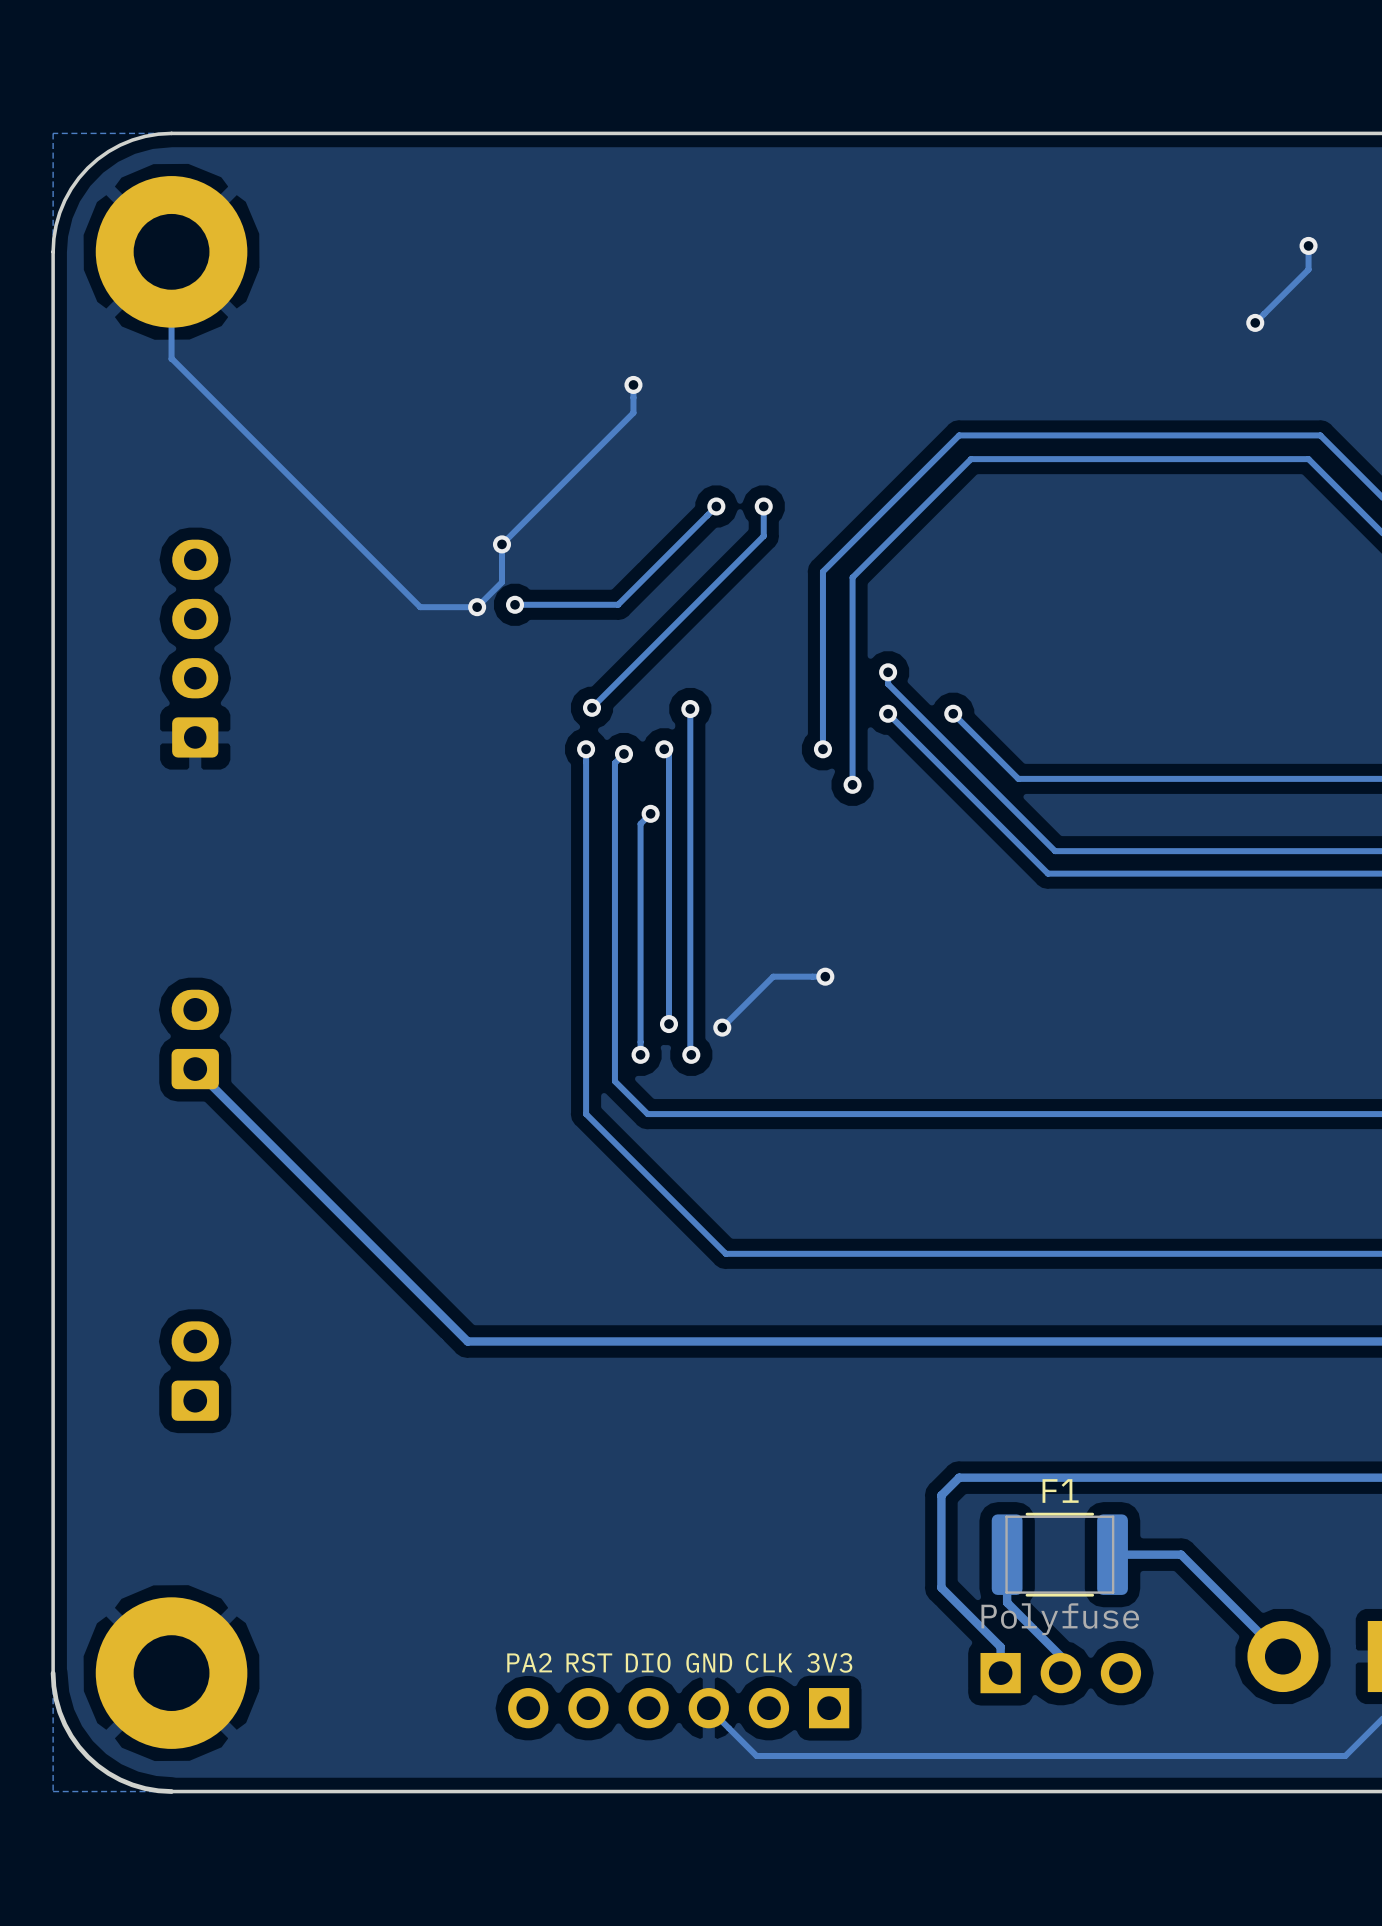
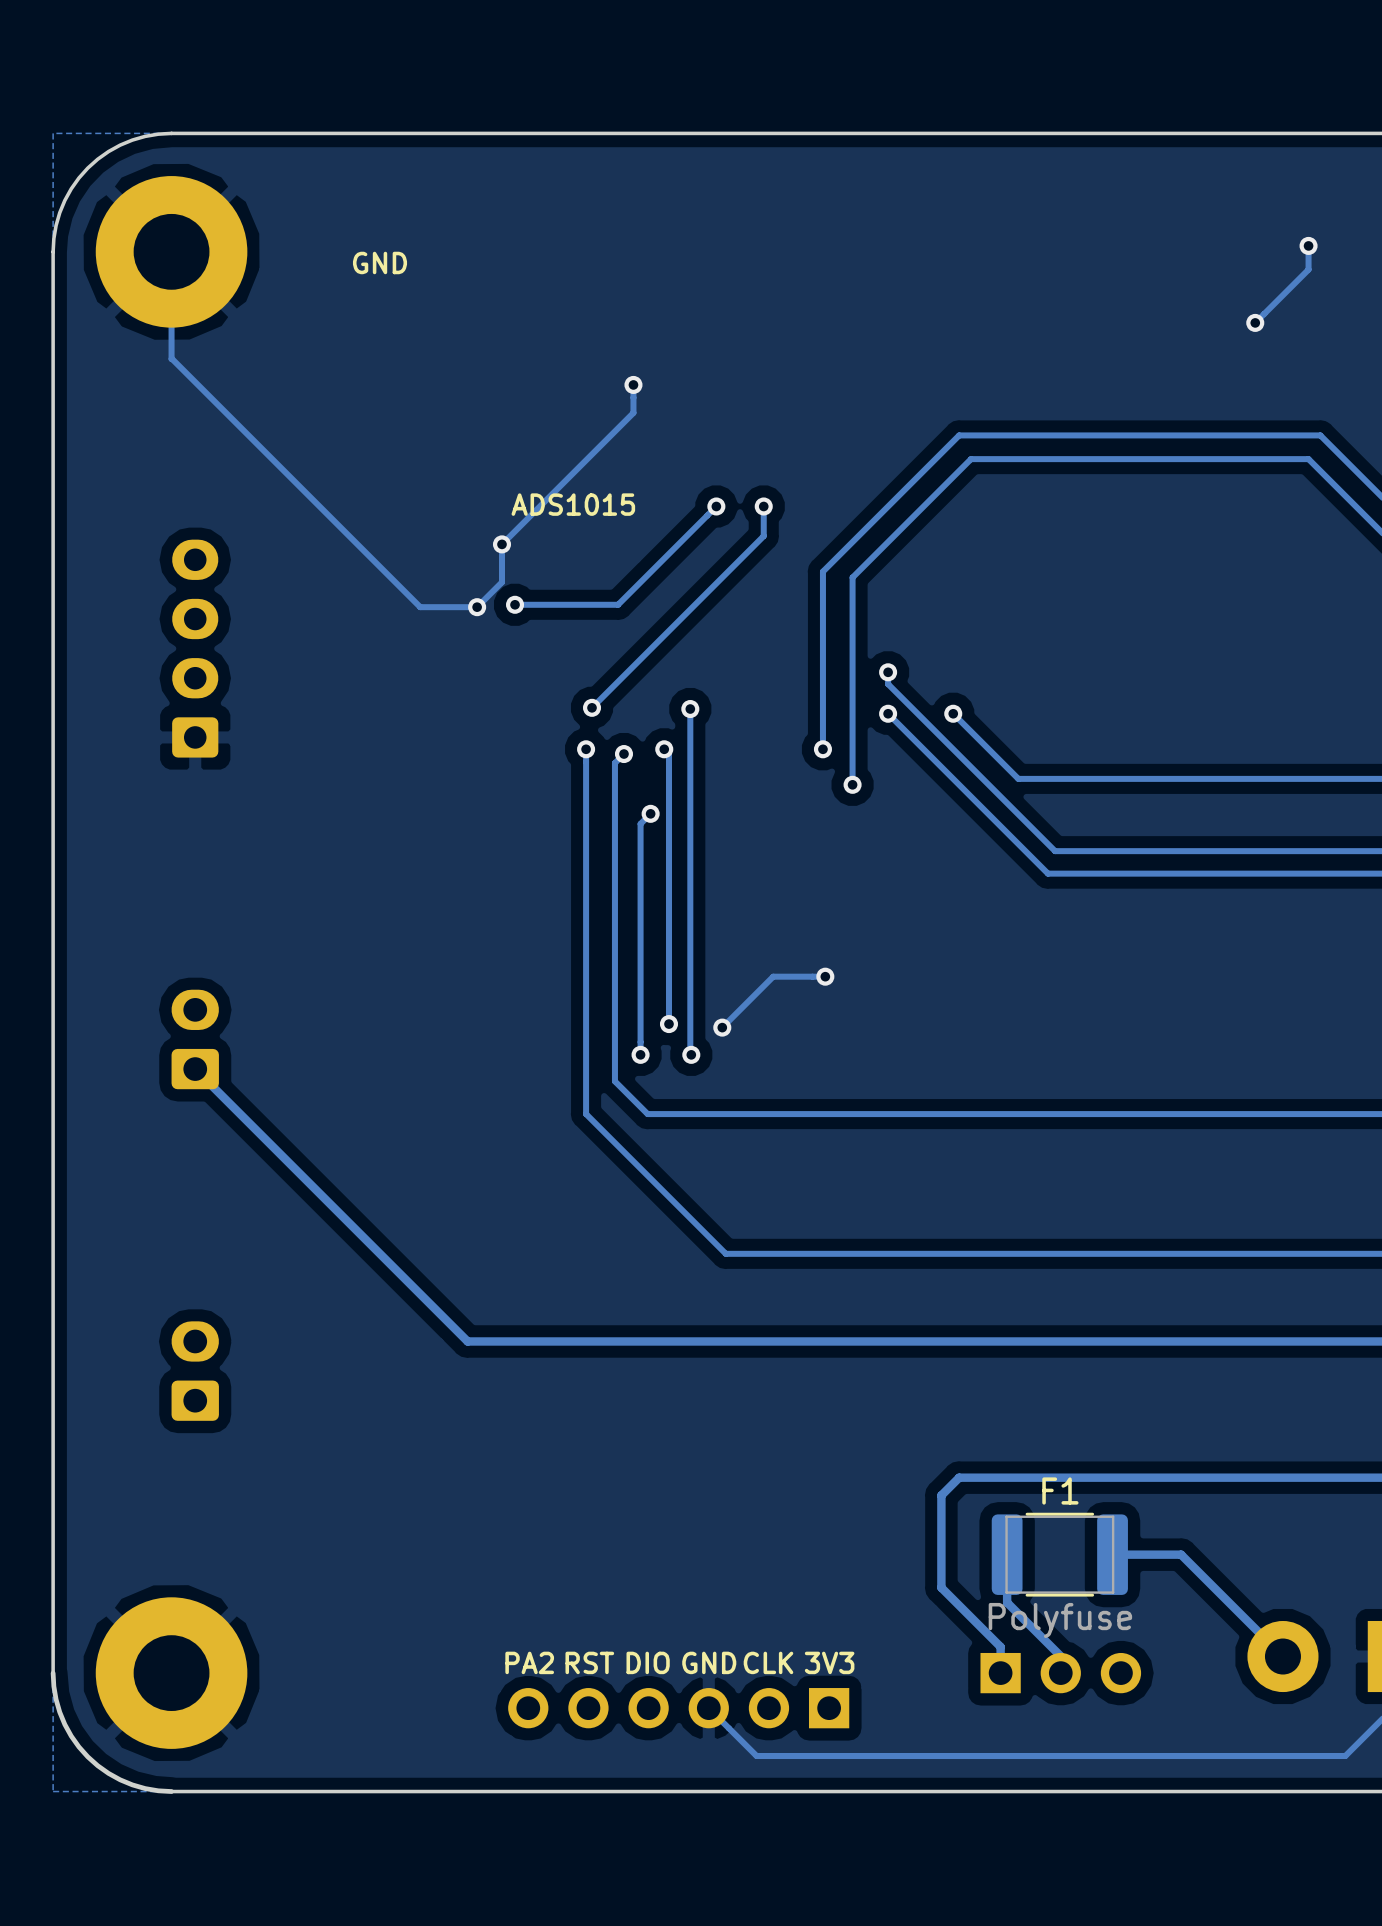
text: none -> GND (380, 262)
text: none -> ADS1015 (573, 504)

